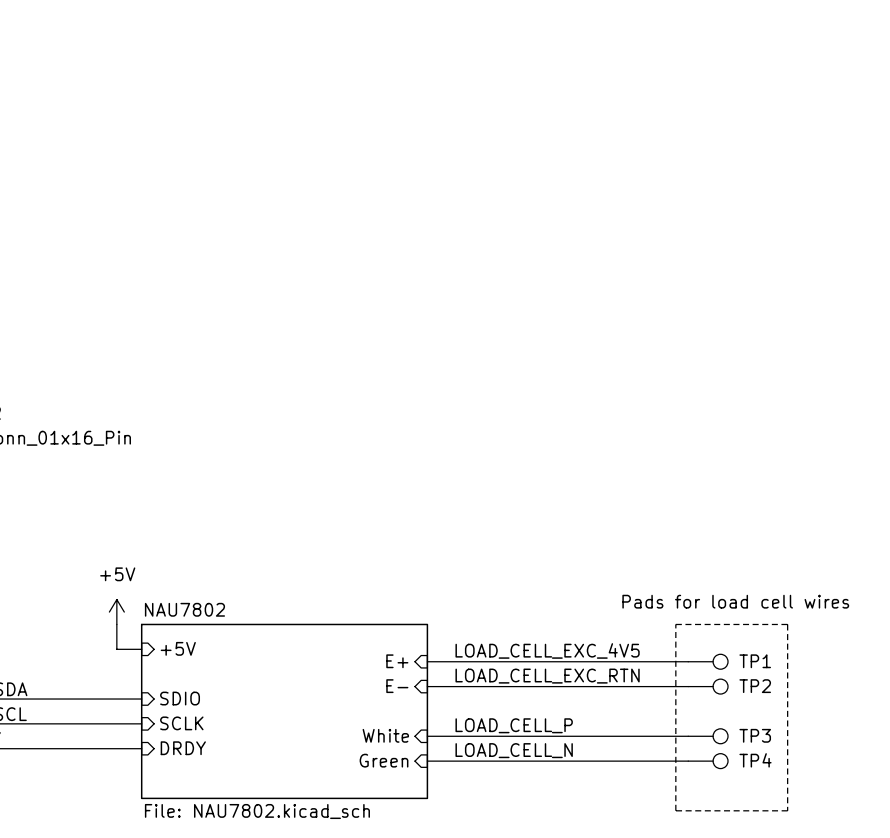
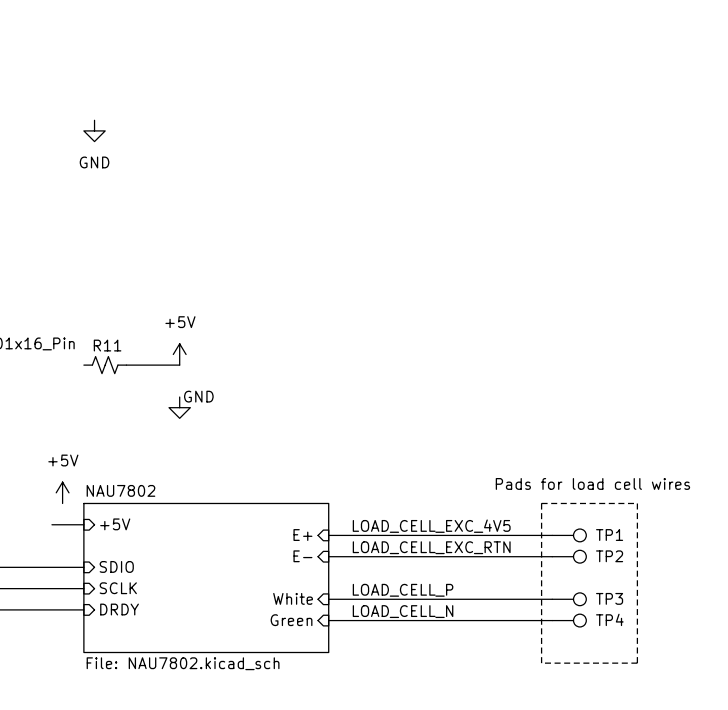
power symbol: none -> GND (94, 130)
power symbol: none -> +5V (179, 354)
R11: none -> (105, 365)
wire: none -> (126, 365) (179, 365)
power symbol: none -> GND (179, 407)
wire: (116, 624) (116, 649) -> (51, 524) (62, 524)

